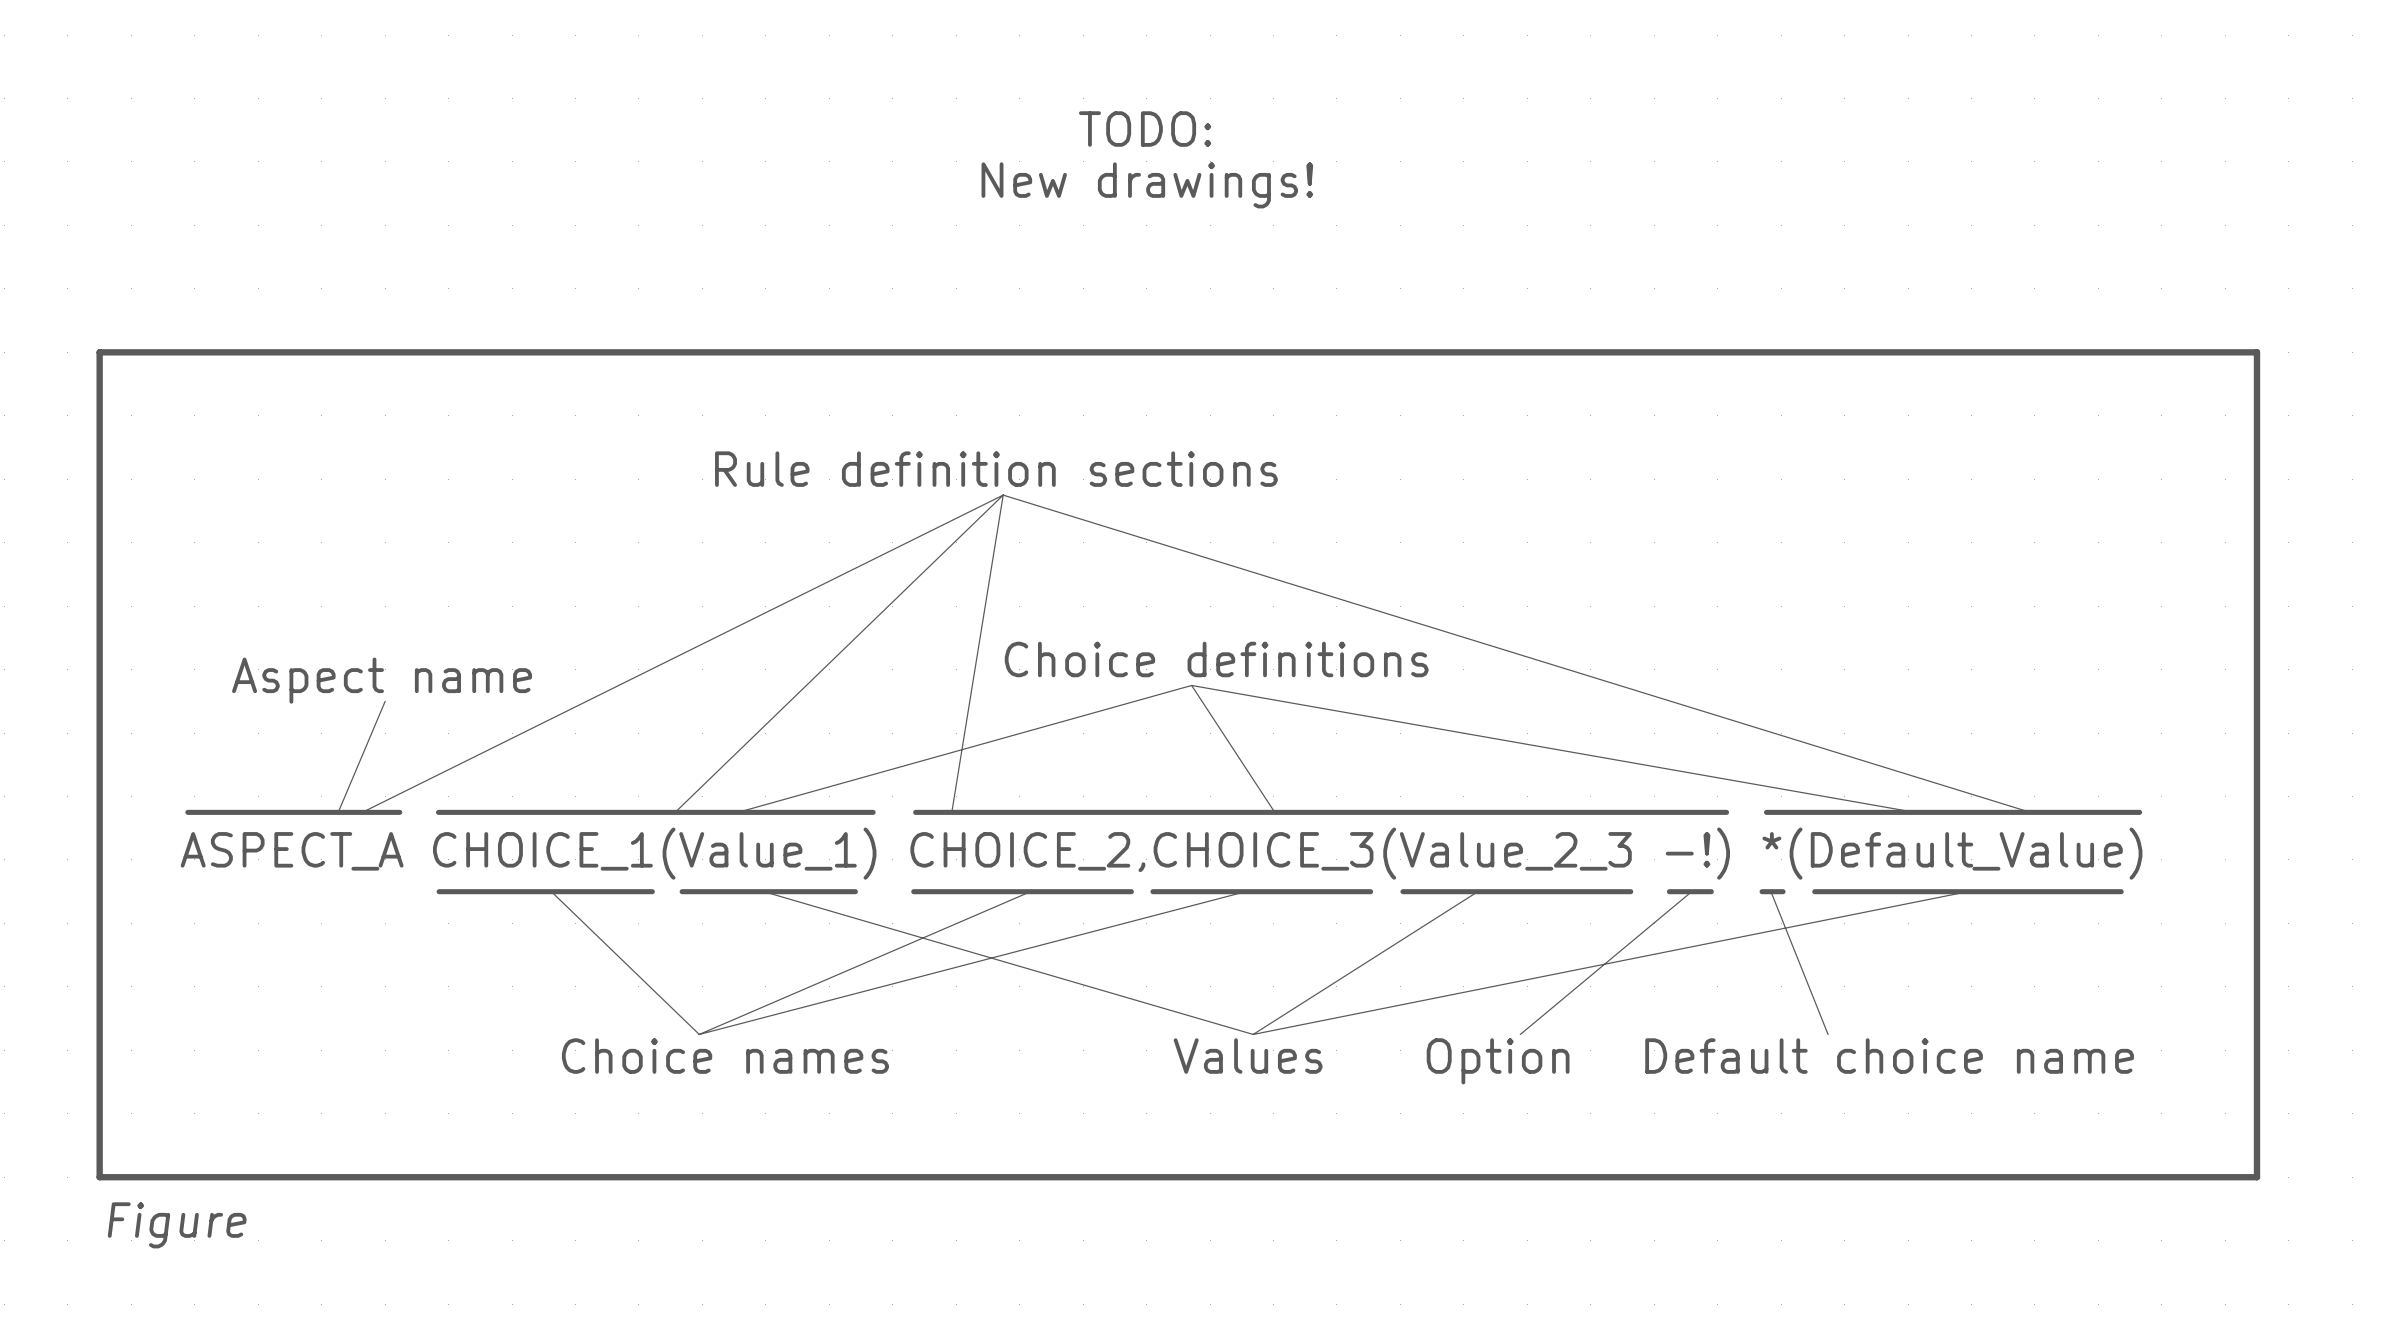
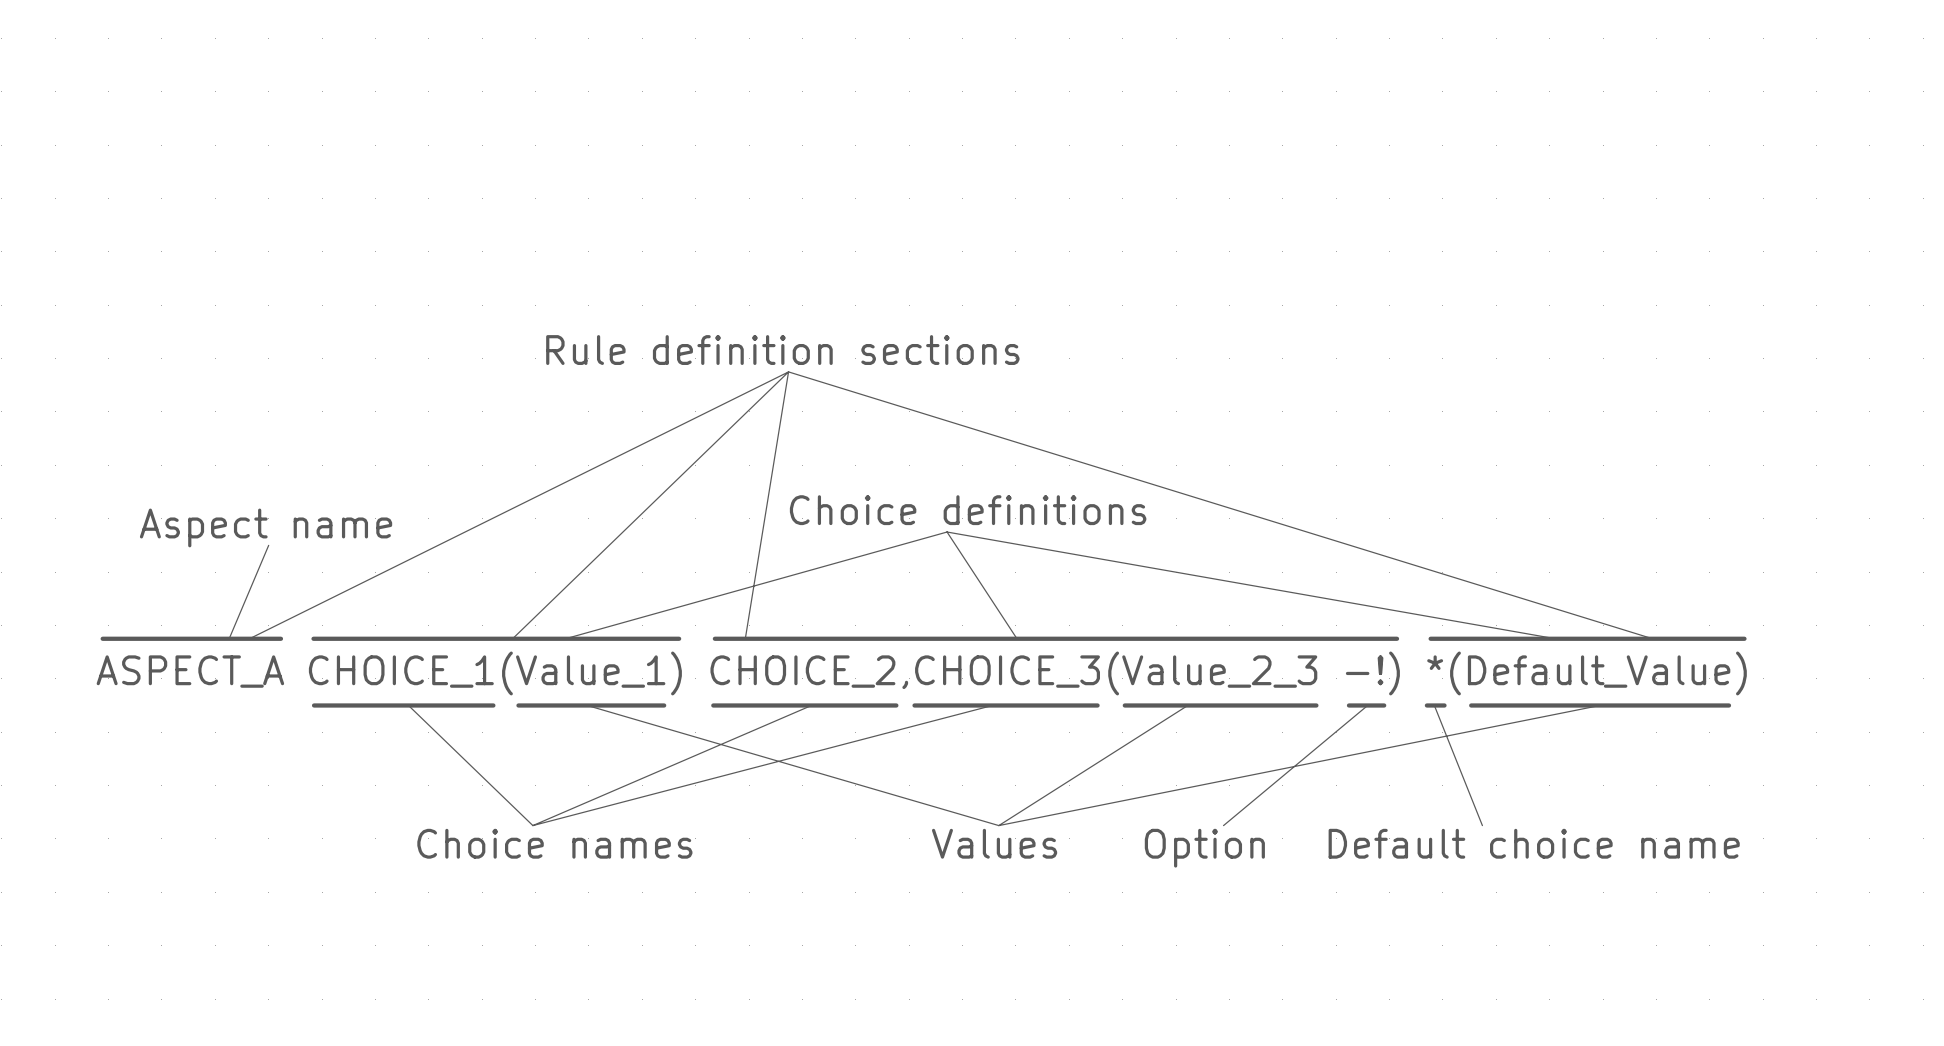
text: TODO: (1145, 129) -> none
text: New drawings! (1147, 185) -> none
line: (99, 352) (2257, 352) (2257, 1177) (99, 1177) (99, 352) -> none
text: Figure (177, 1225) -> none

